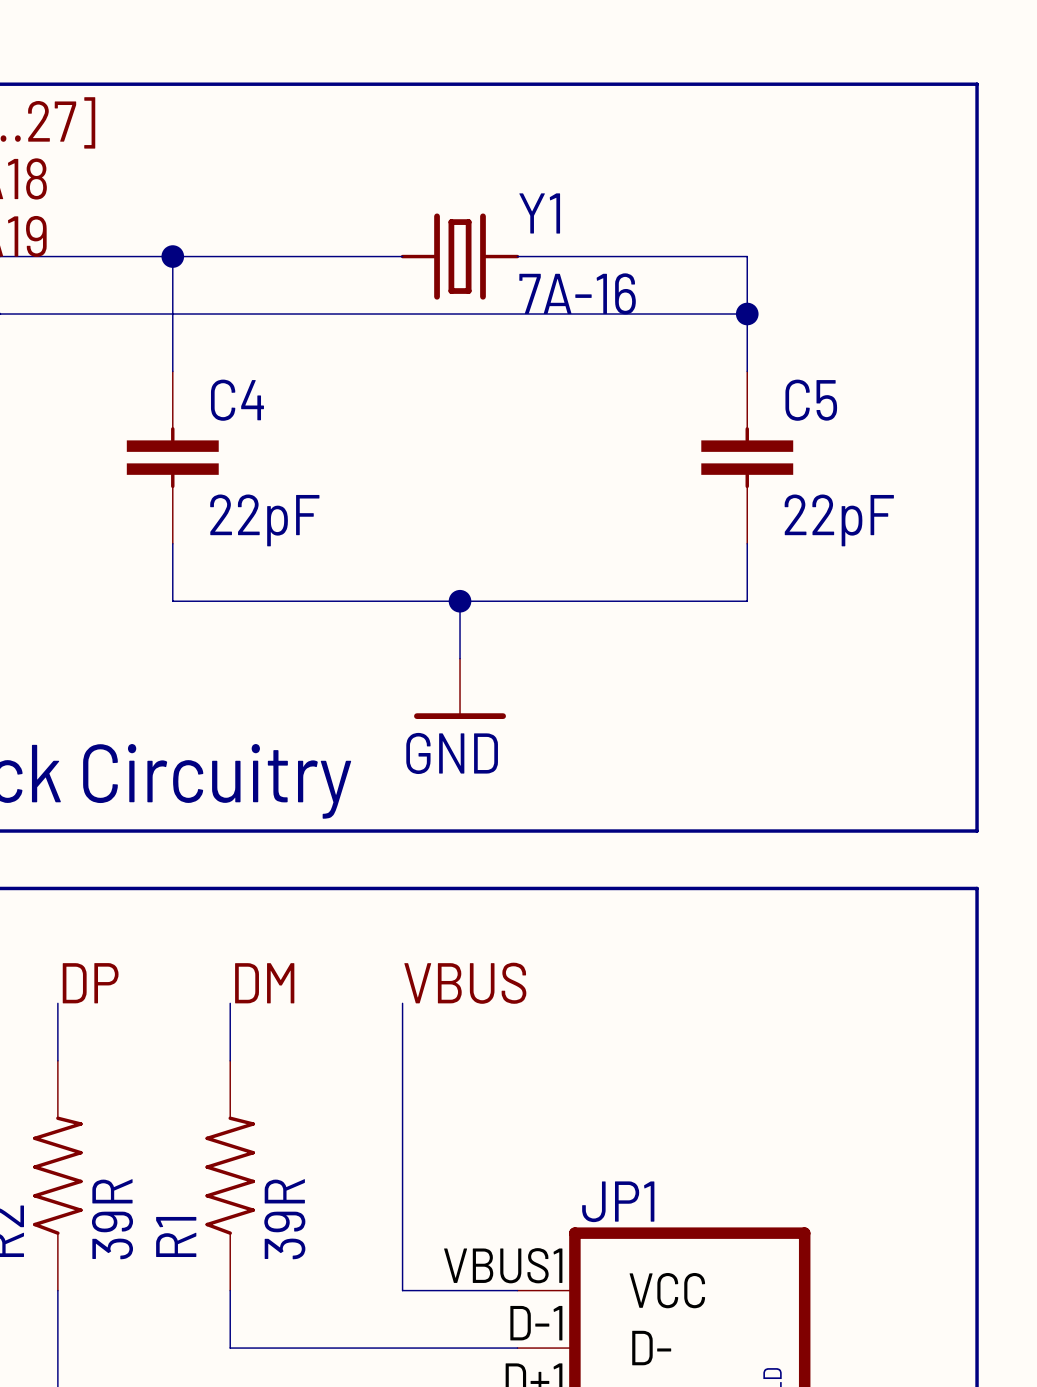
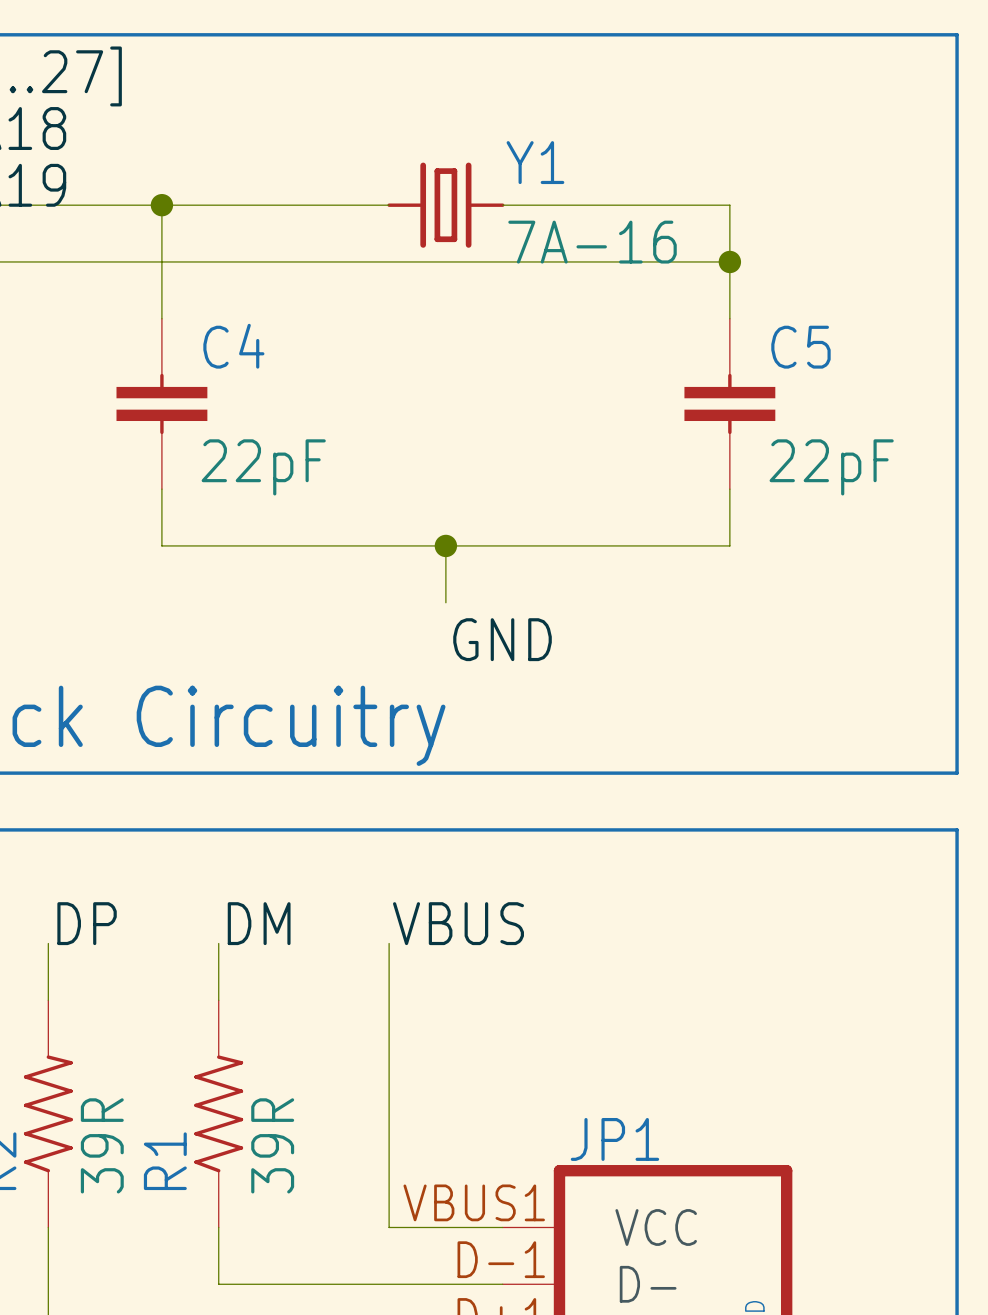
power symbol: GND (460, 688) -> none
label: none -> GND (502, 639)

